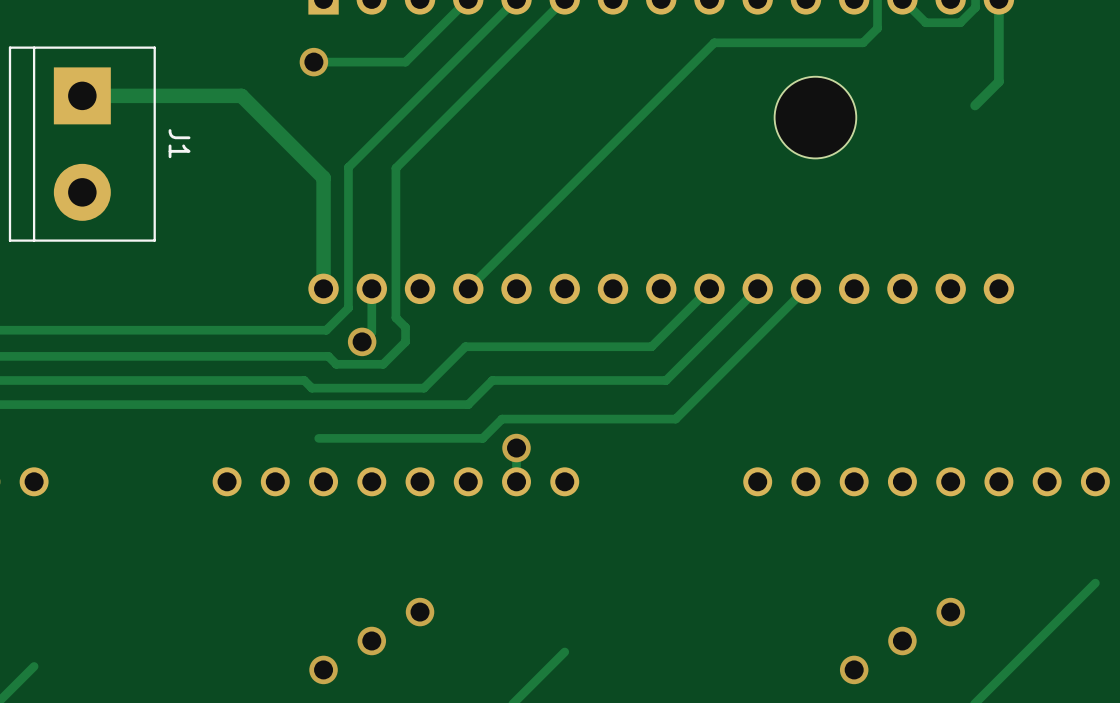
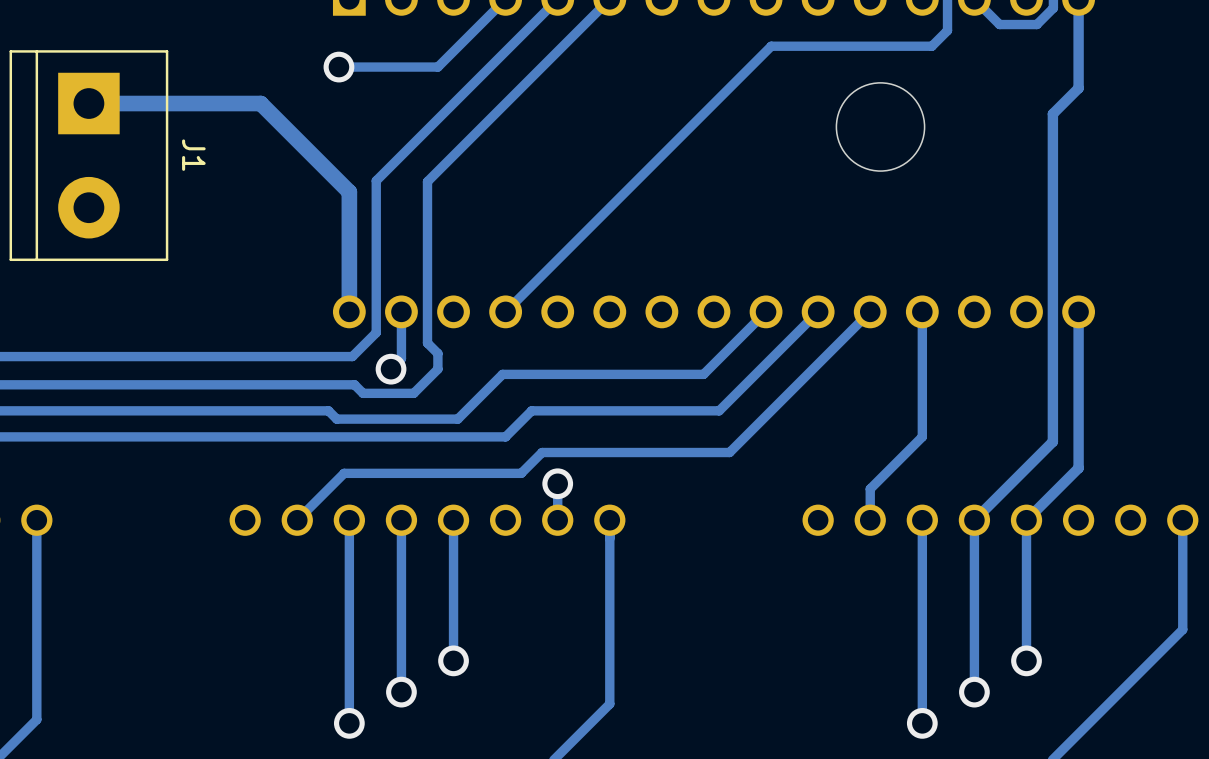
track: none -> (1052, 113) (1052, 441) (974, 520) (974, 692)
track: none -> (922, 311) (922, 436) (870, 488) (870, 520)
track: none -> (1078, 311) (1078, 468) (1026, 520) (1026, 660)
track: none -> (344, 473) (297, 520)
track: none -> (36, 520) (36, 719)
track: none -> (349, 520) (349, 723)
track: none -> (401, 520) (401, 692)
track: none -> (453, 520) (453, 660)
track: none -> (609, 520) (609, 704)
track: none -> (922, 520) (922, 723)
track: none -> (1182, 520) (1182, 629)

